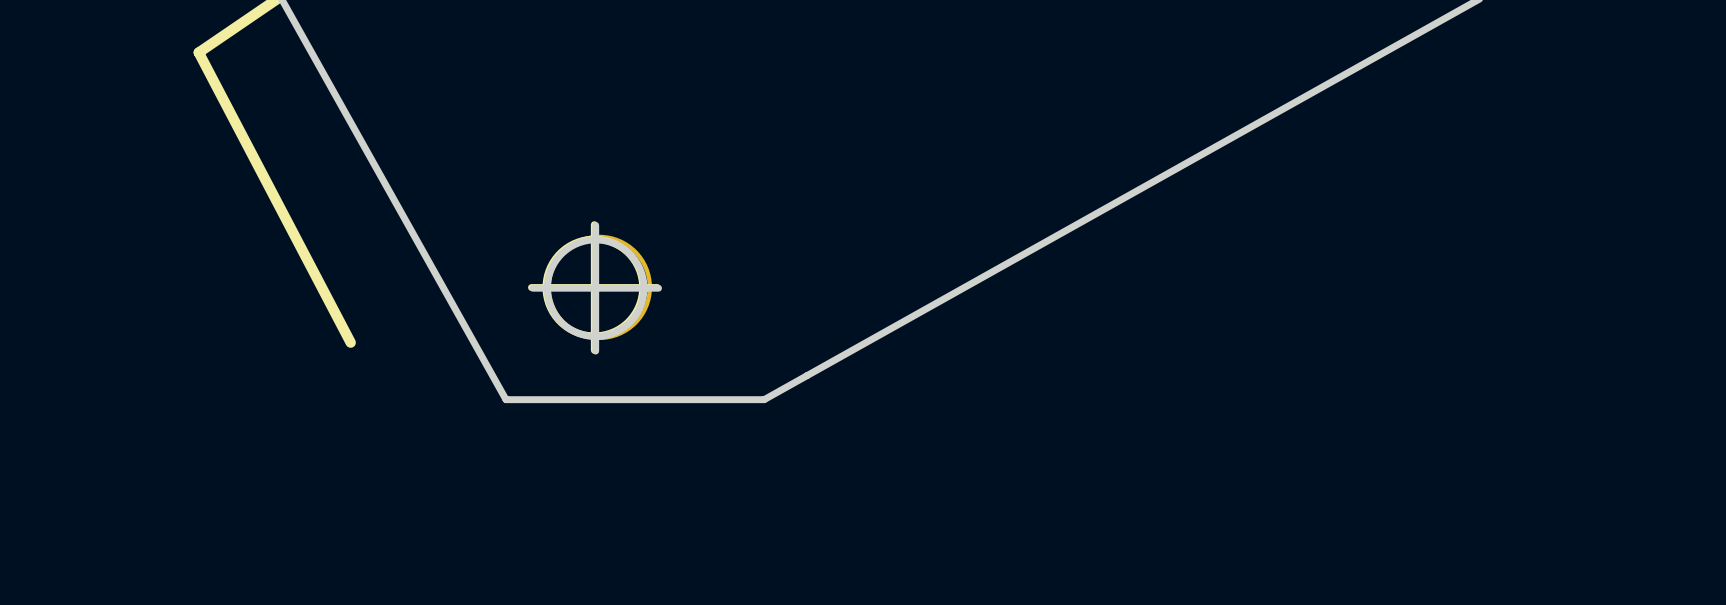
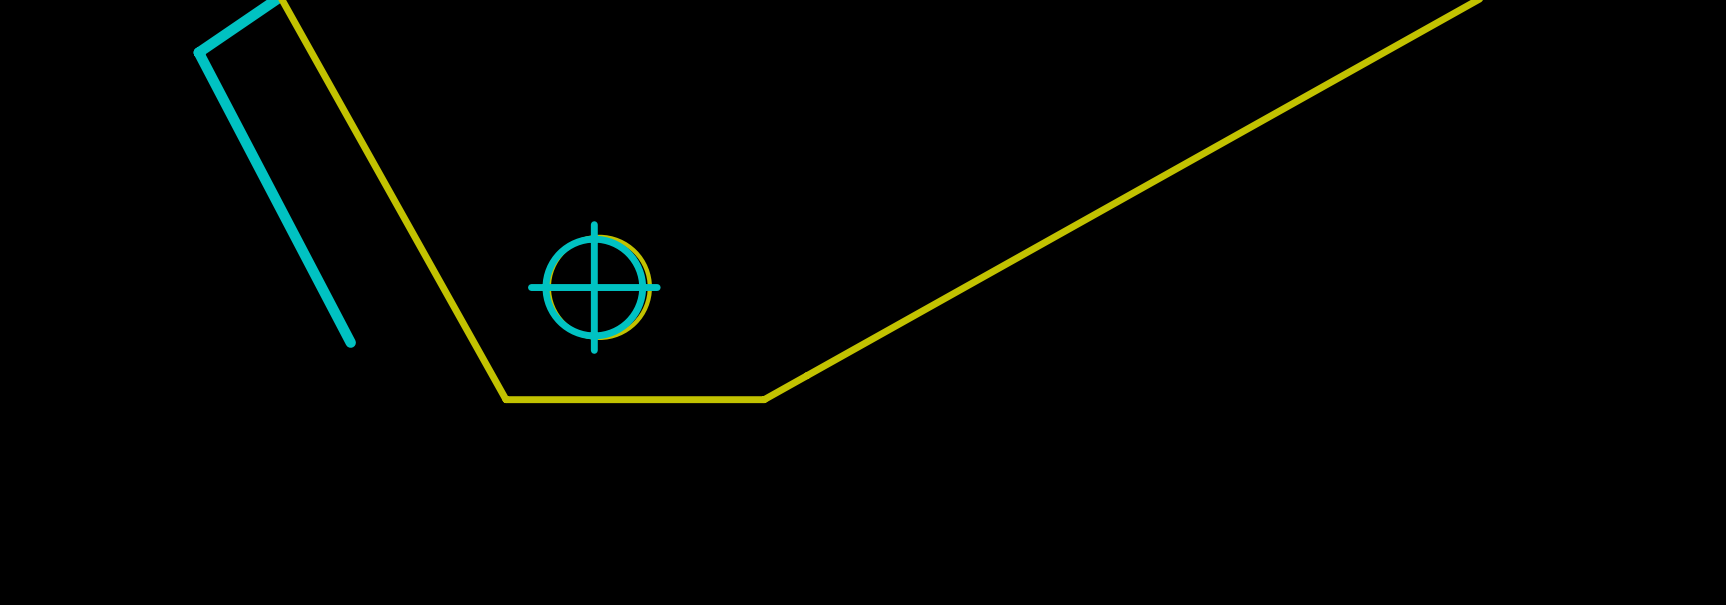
board edge: (595, 225) (595, 351) -> none
round board edge: [543, 236, 648, 341] -> none
board edge: (532, 288) (658, 288) -> none

